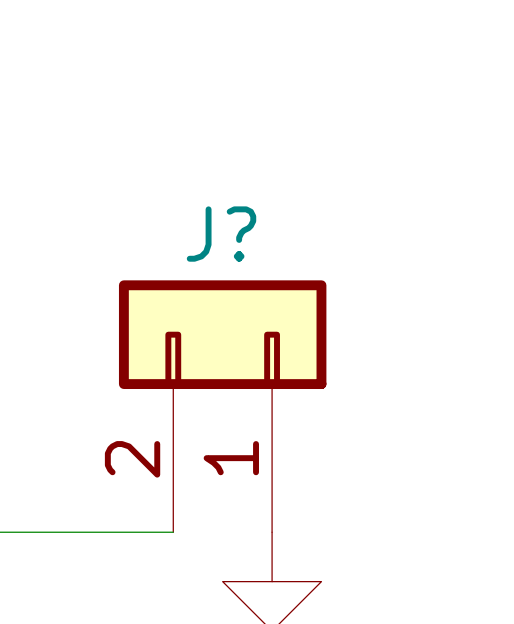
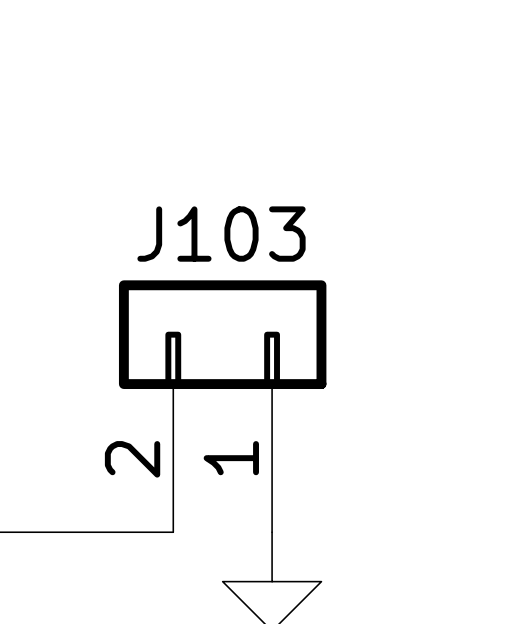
J? name: J? (221, 234) -> J103 (221, 234)

